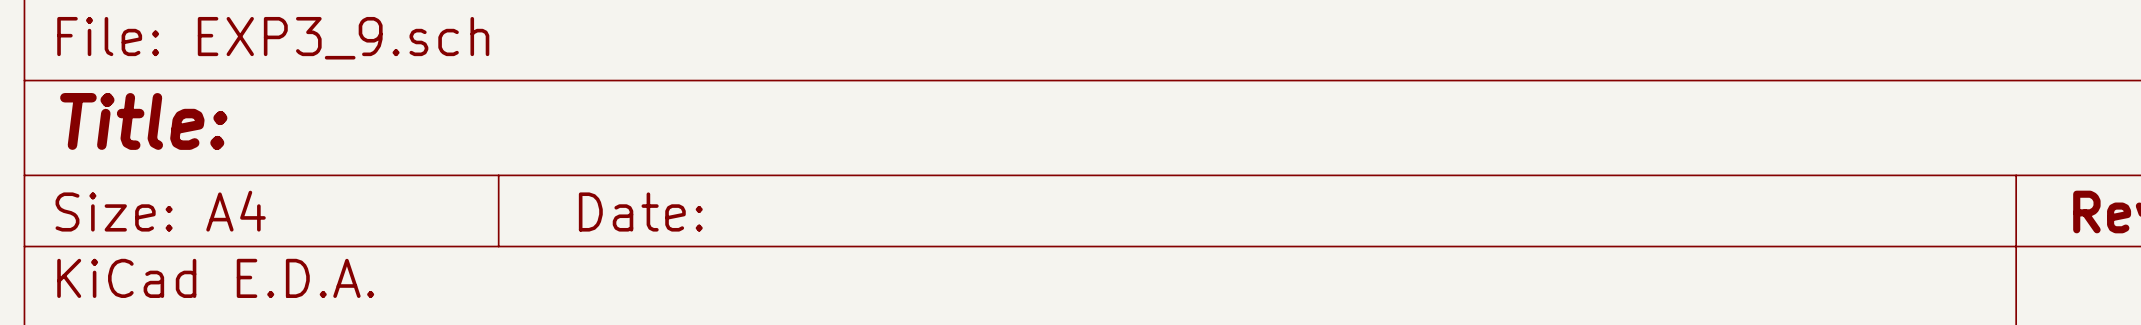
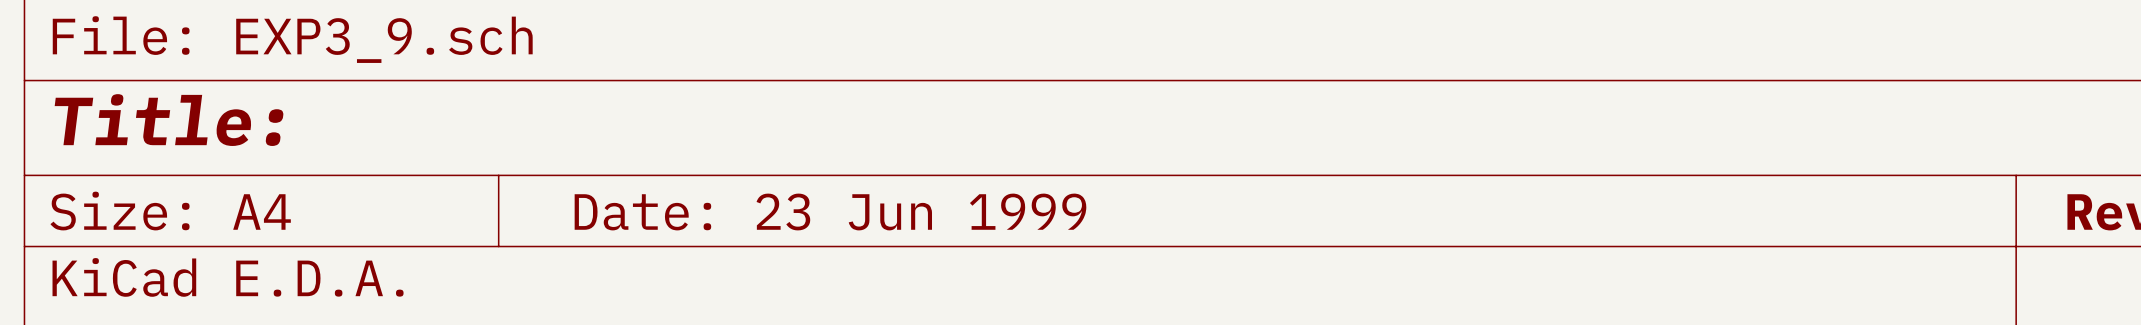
title block: Date: (640, 212) -> Date: 23 Jun 1999 (830, 212)

